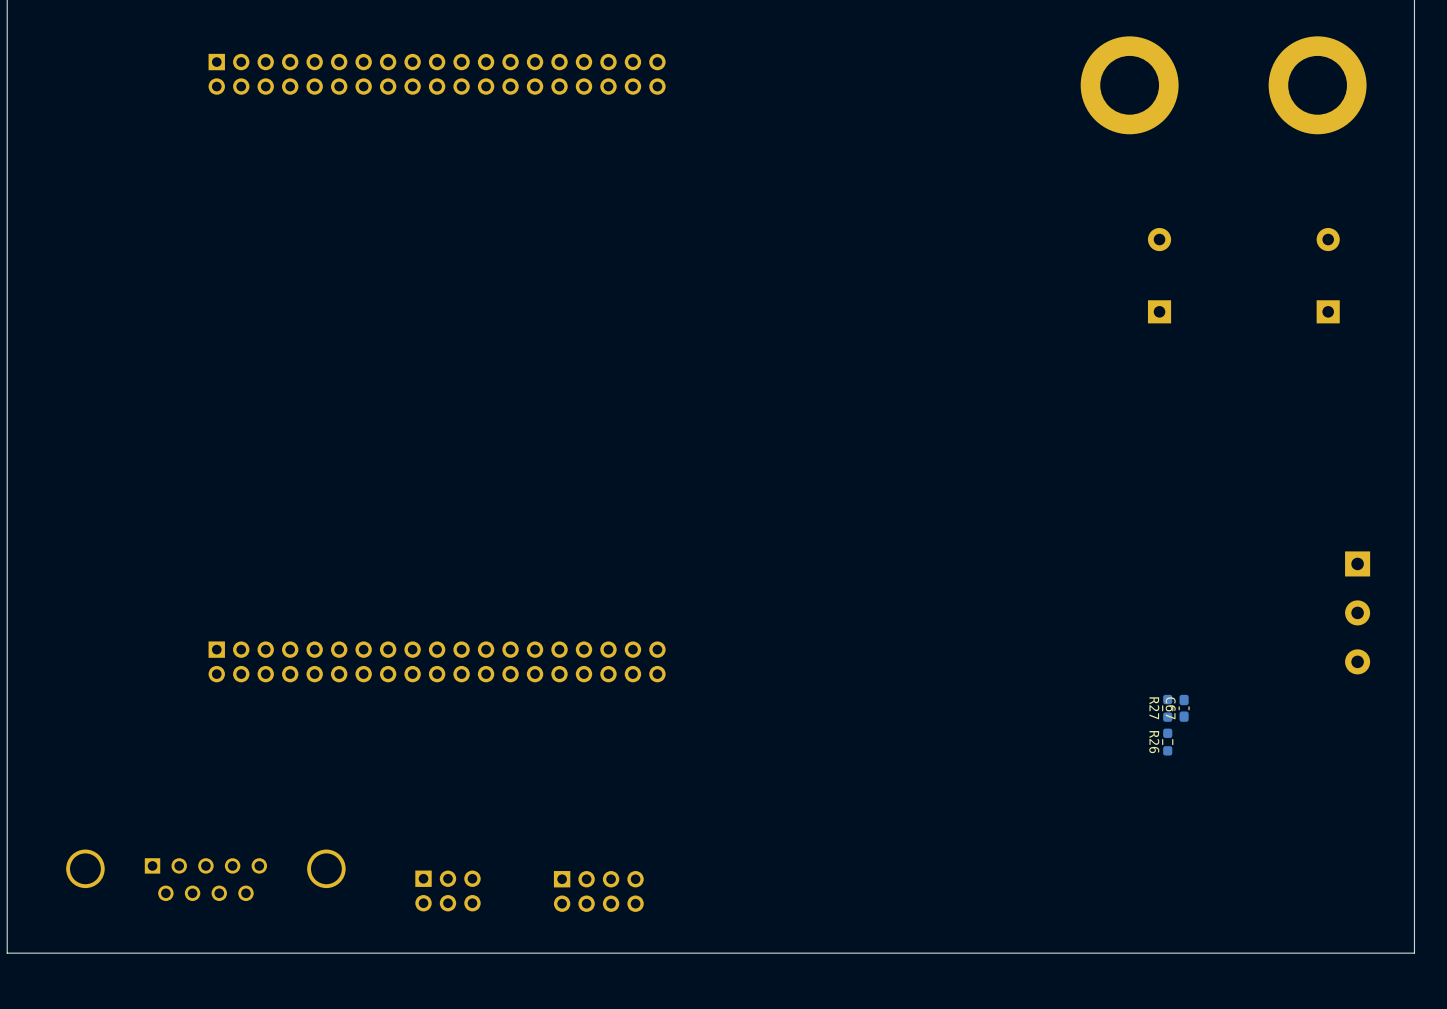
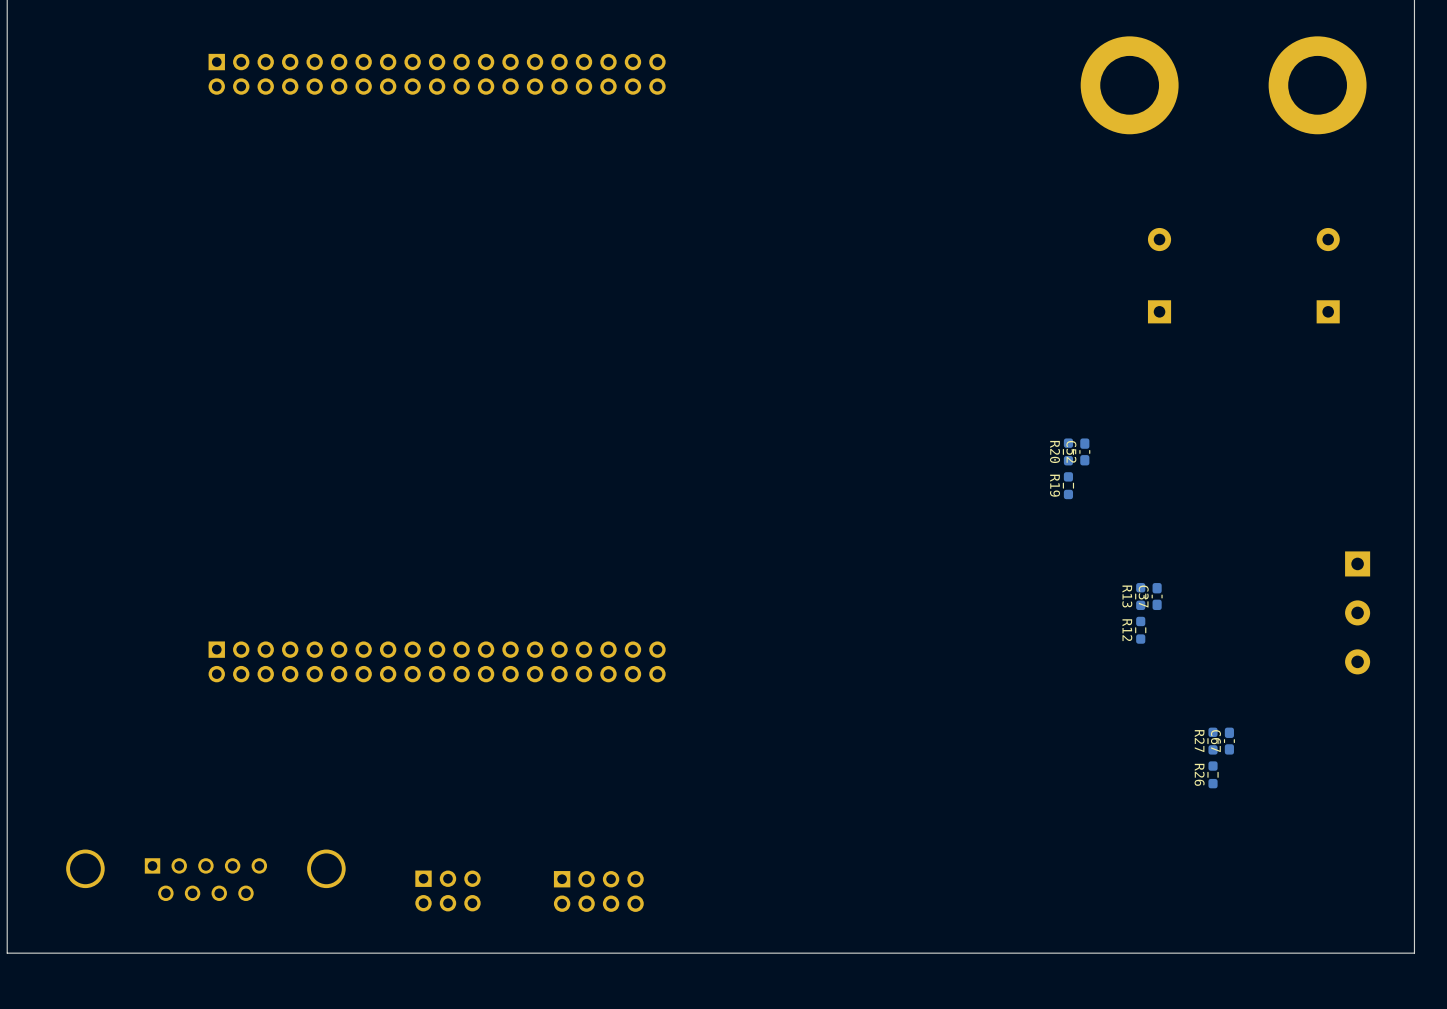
R20: none -> (1068, 451)
C52: none -> (1084, 451)
R19: none -> (1068, 485)
R13: none -> (1140, 596)
C37: none -> (1157, 596)
R12: none -> (1140, 630)
R27 position: (1167, 708) -> (1213, 741)
C67 position: (1184, 708) -> (1229, 741)
R26 position: (1167, 742) -> (1213, 774)

